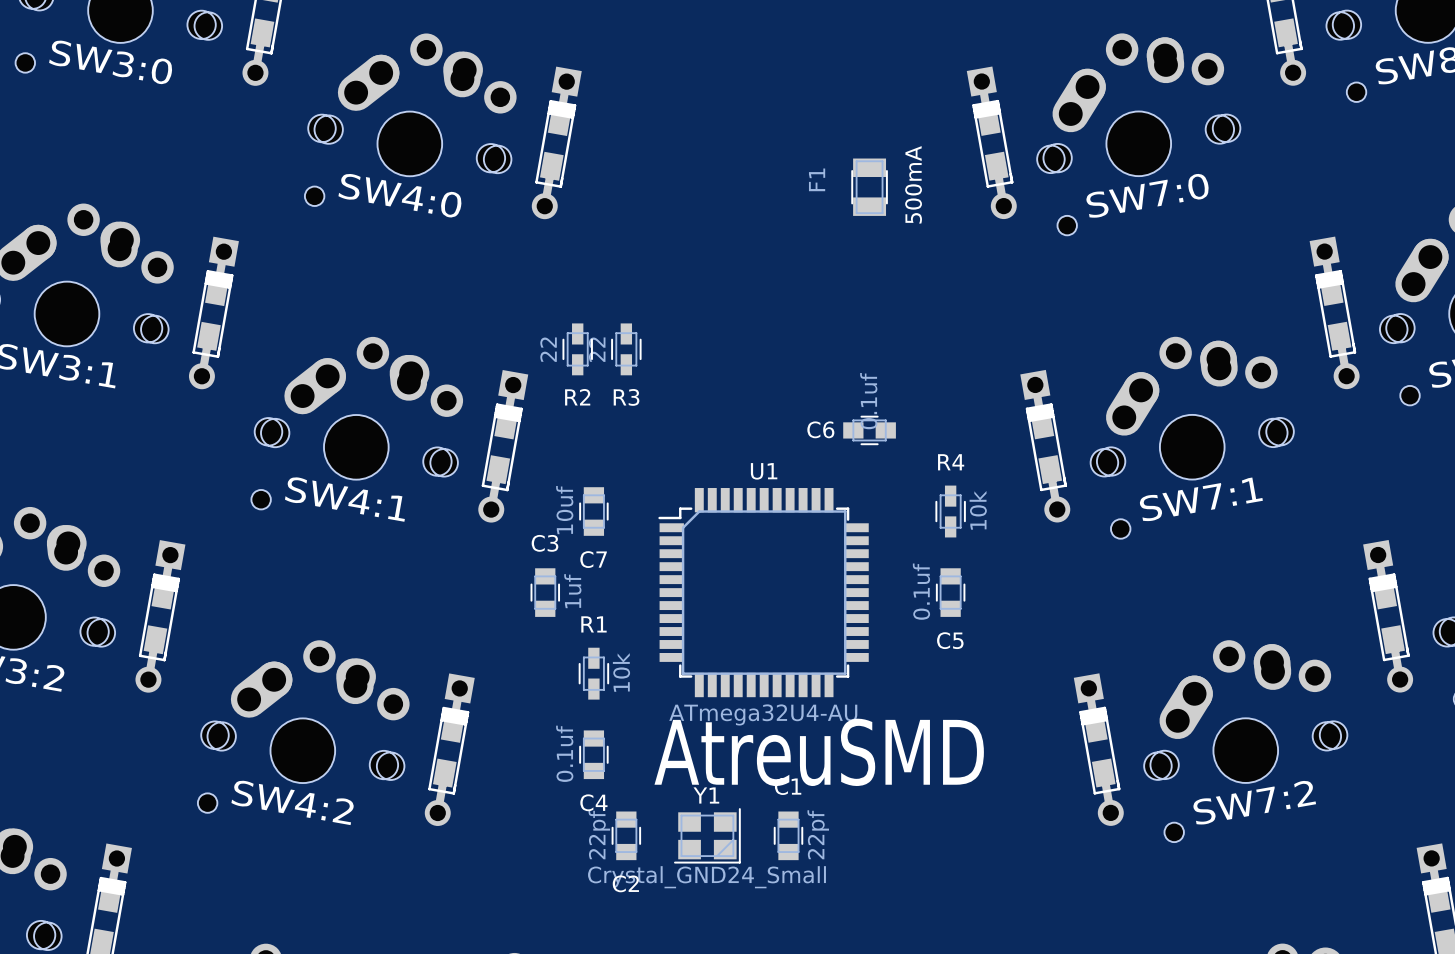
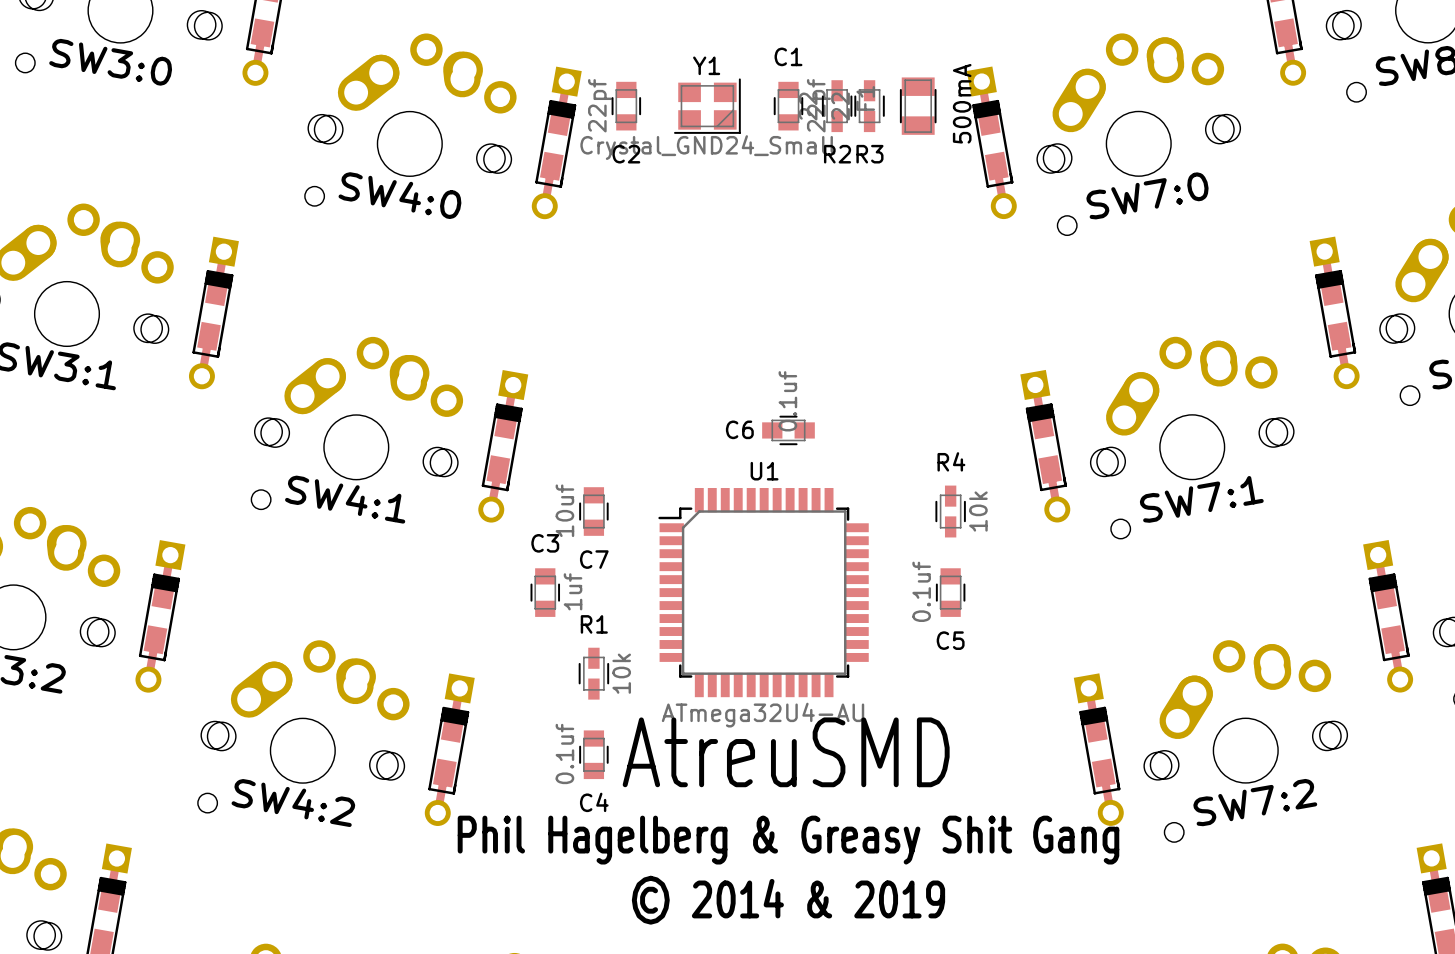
500mA position: (869, 187) -> (918, 106)
R2 position: (577, 349) -> (837, 106)
R3 position: (626, 349) -> (869, 106)
C6 position: (869, 430) -> (788, 430)
text position: AtreuSMD (819, 752) -> AtreuSMD (786, 752)
C2 position: (626, 835) -> (626, 106)
Y1 position: (707, 835) -> (707, 106)
C1 position: (788, 835) -> (788, 106)
text: none -> Phil Hagelberg & Greasy Shit Gang (788, 840)
text: none -> © 2014 & 2019 (788, 900)

